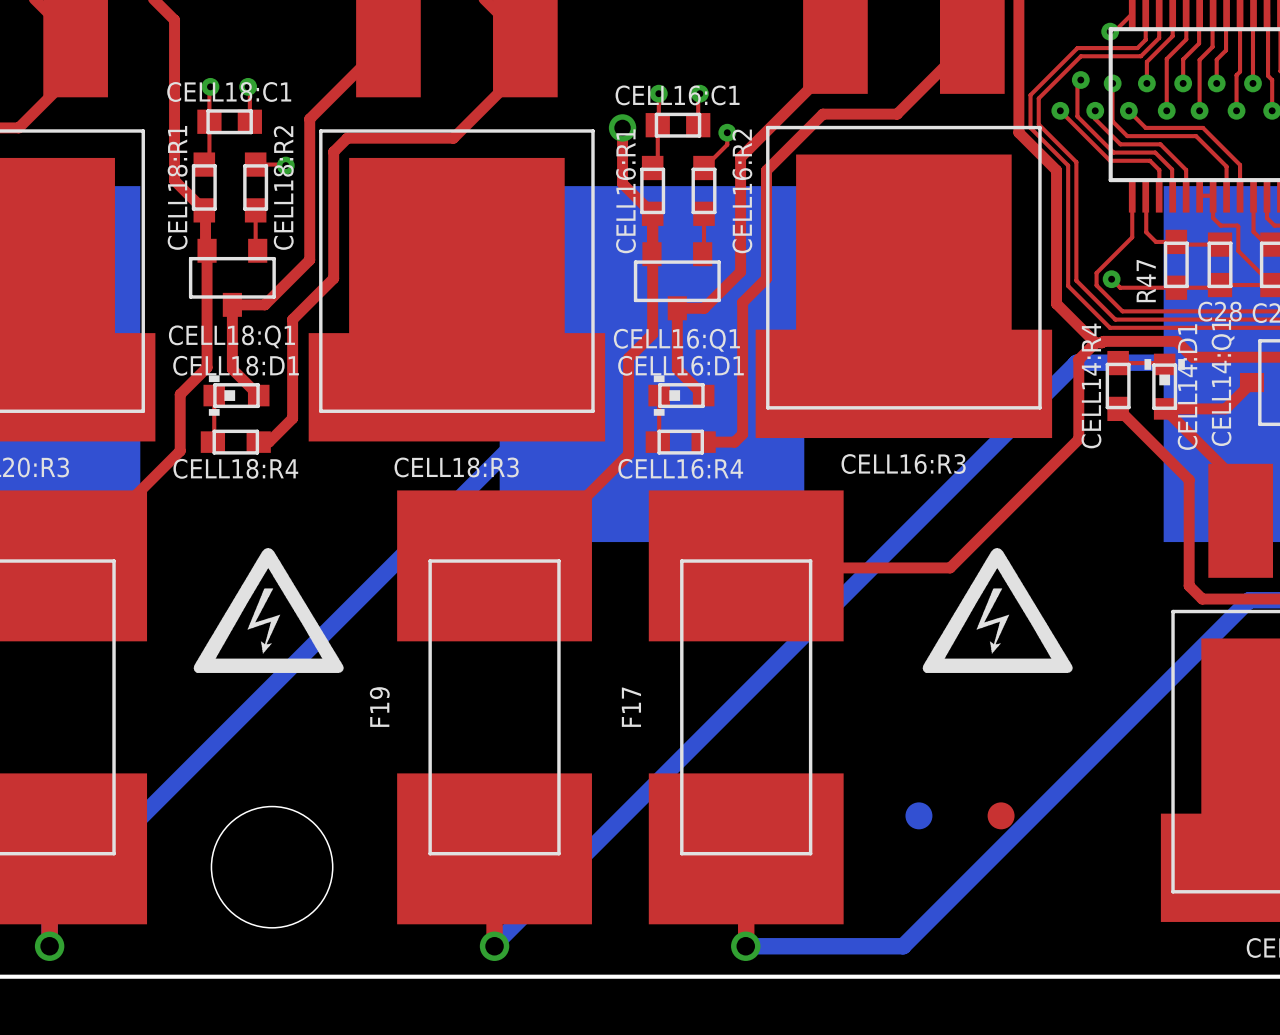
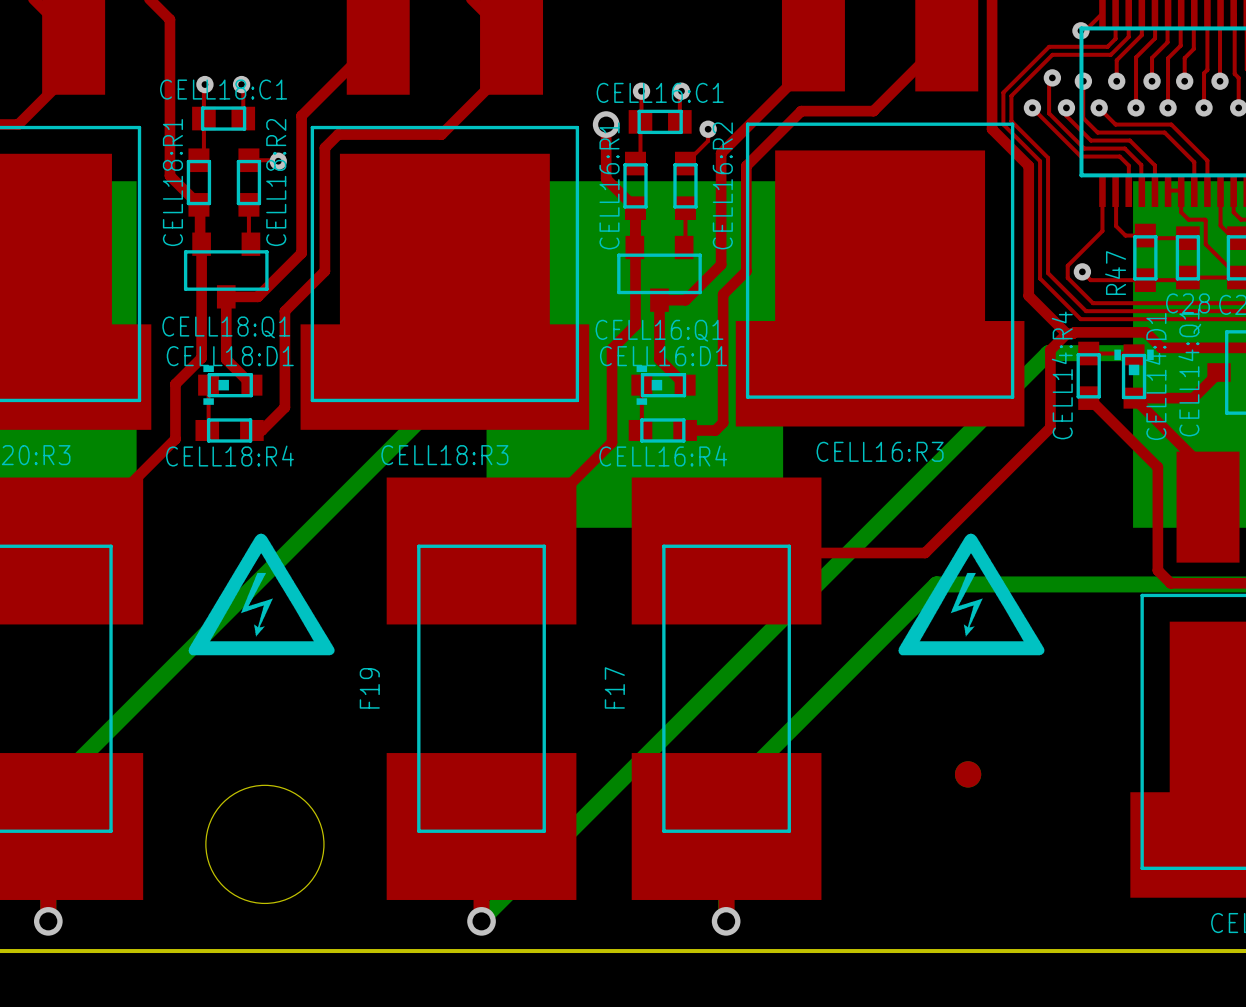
bottom track: (583, 374) (49, 908) -> (568, 364) (475, 364) (48, 791) (48, 884)
bottom track: (1249, 600) (903, 946) (745, 946) -> (1216, 584) (936, 584) (726, 794) (726, 921)
drawing: [905, 802, 933, 830] -> none
drawing shape: [987, 802, 1015, 830] -> [954, 761, 982, 788]

